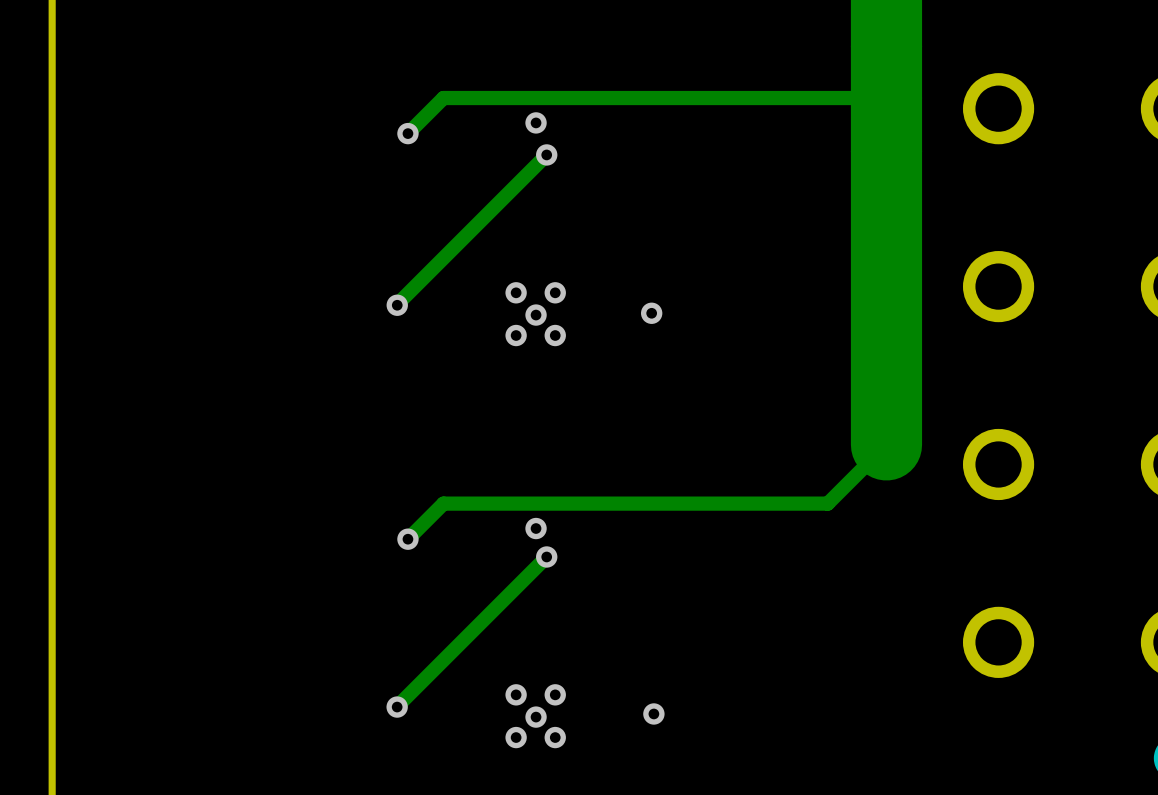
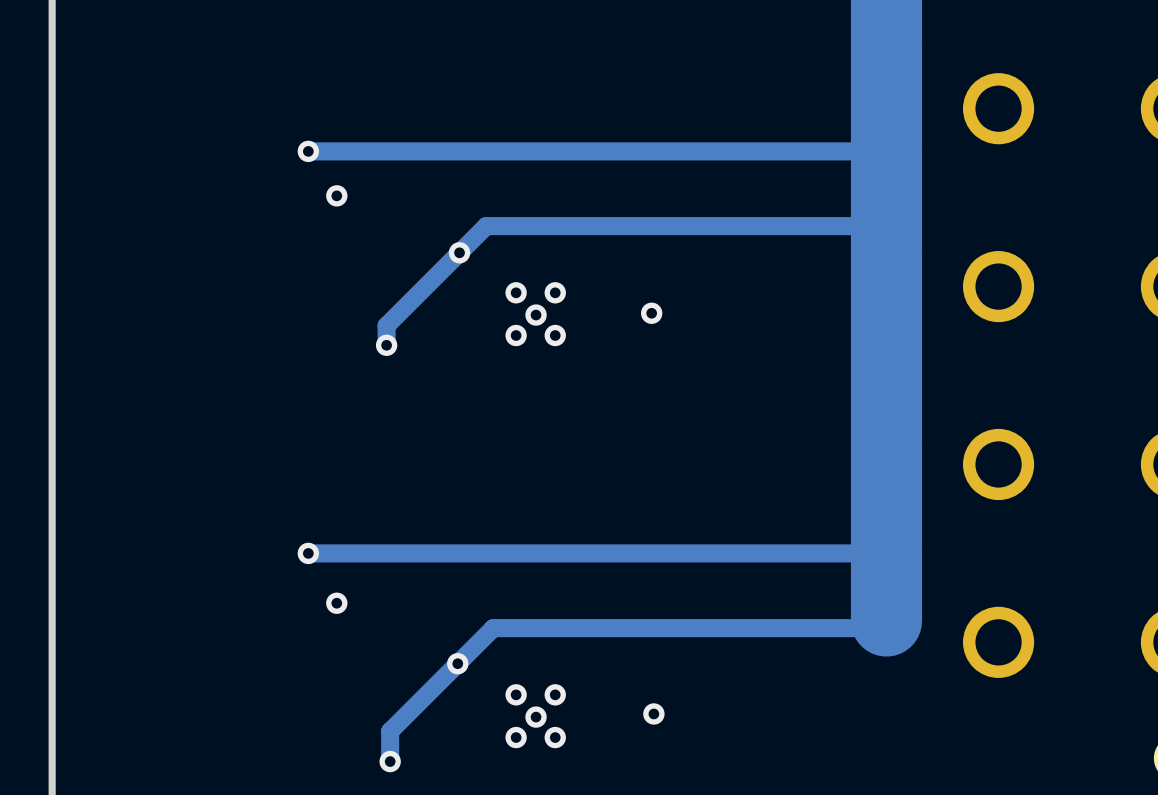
track: (886, 98) (443, 98) (407, 133) -> none
via: (536, 122) -> none
via: (407, 133) -> none
via: none -> (308, 151)
track: none -> (886, 151) (308, 151)
track: (546, 154) (397, 305) -> none
via: (546, 154) -> none
via: none -> (336, 195)
via: none -> (459, 252)
track: none -> (886, 254) (858, 226) (486, 226) (386, 325) (386, 345)
via: (397, 305) -> none
via: none -> (386, 345)
track: (886, 444) (827, 503) (443, 503) (407, 539) -> (886, 444) (886, 621) (879, 628) (493, 628) (390, 731) (390, 761)
via: (536, 528) -> none
via: (407, 539) -> none
track: none -> (886, 549) (882, 553) (308, 553)
via: none -> (308, 553)
track: (546, 556) (397, 706) -> none
via: (546, 556) -> none
via: none -> (336, 603)
via: none -> (457, 663)
via: (397, 707) -> none
via: none -> (390, 761)

